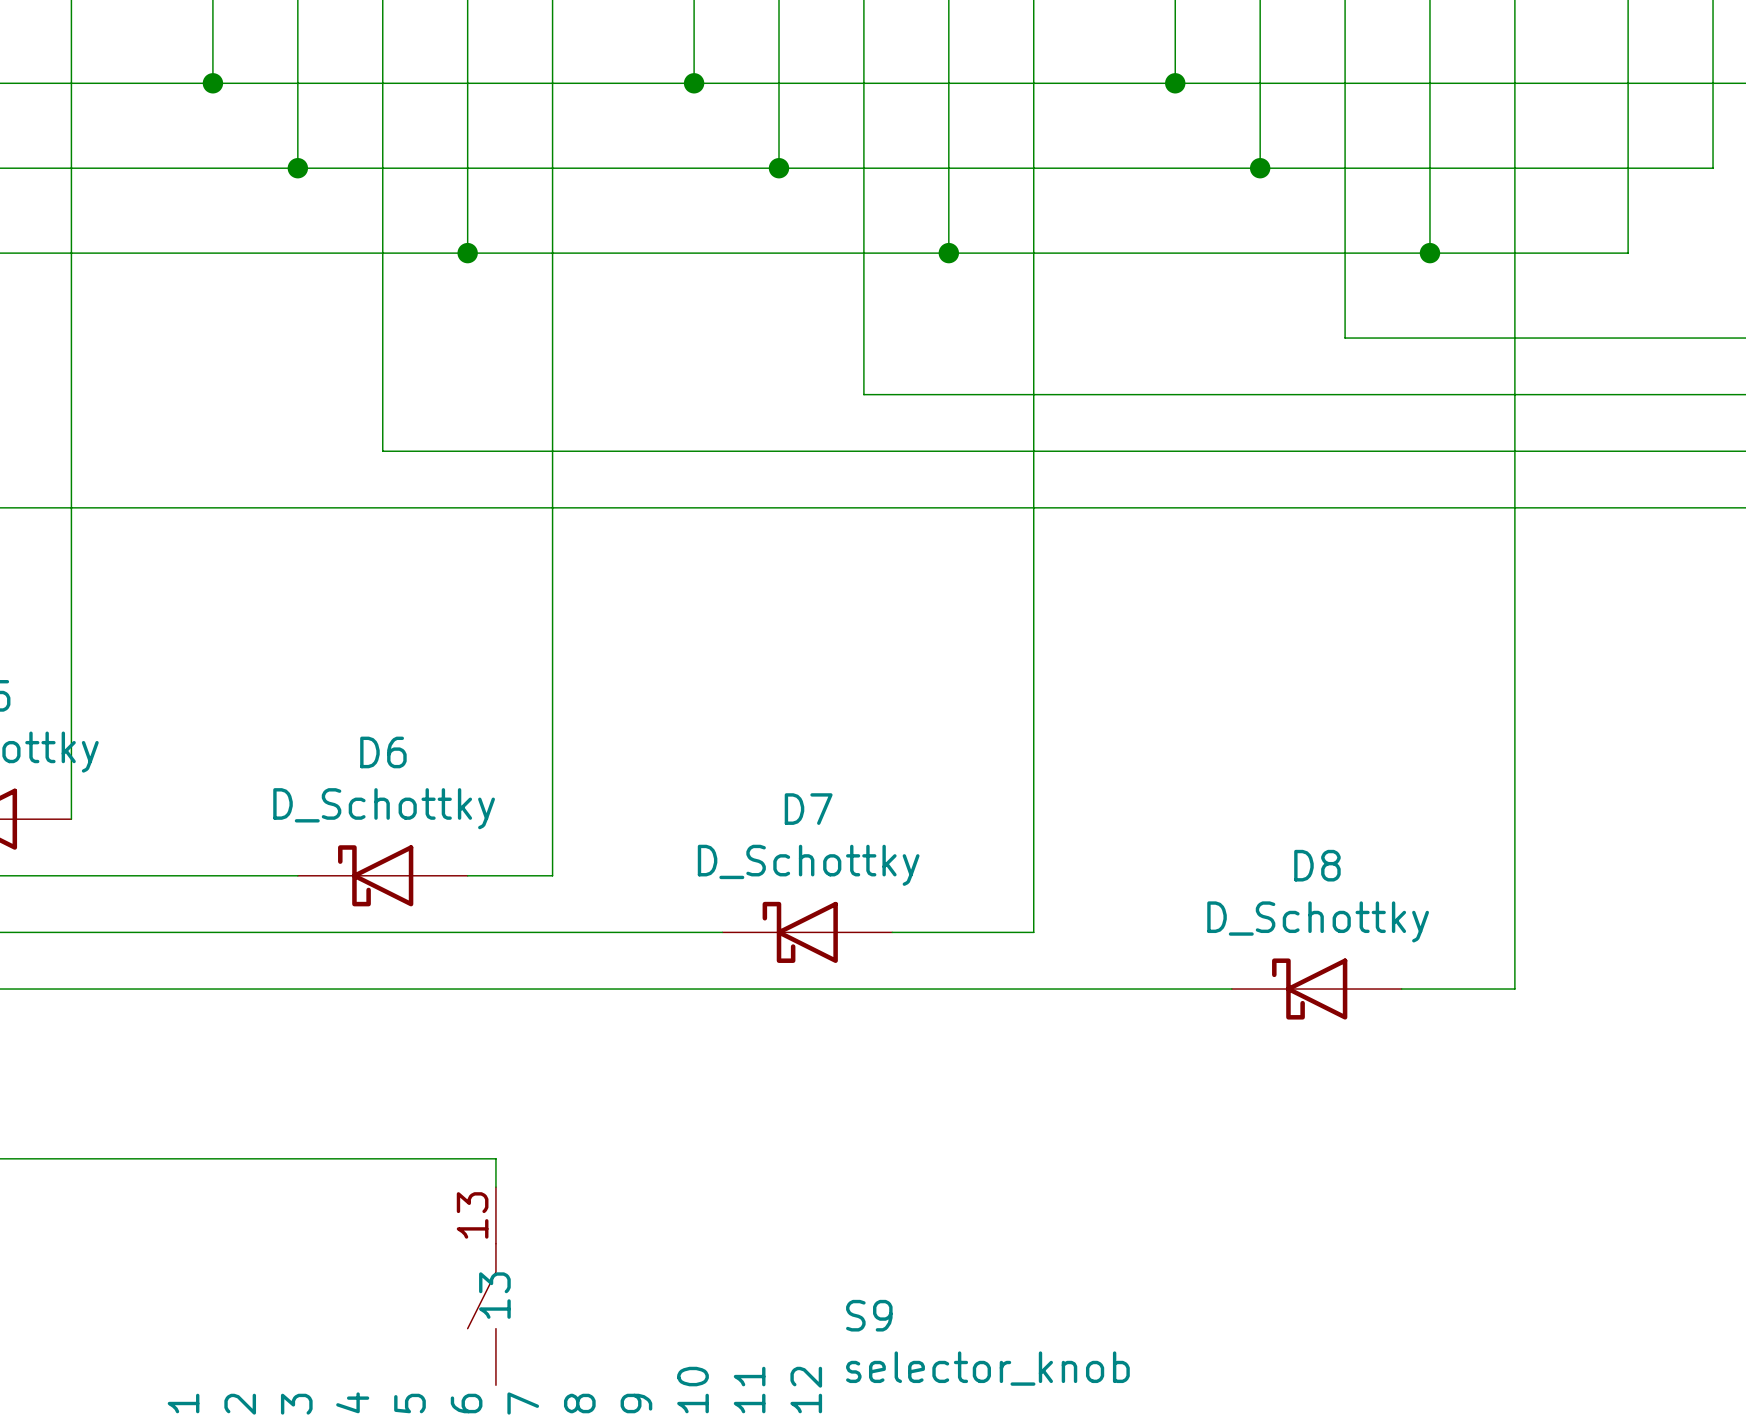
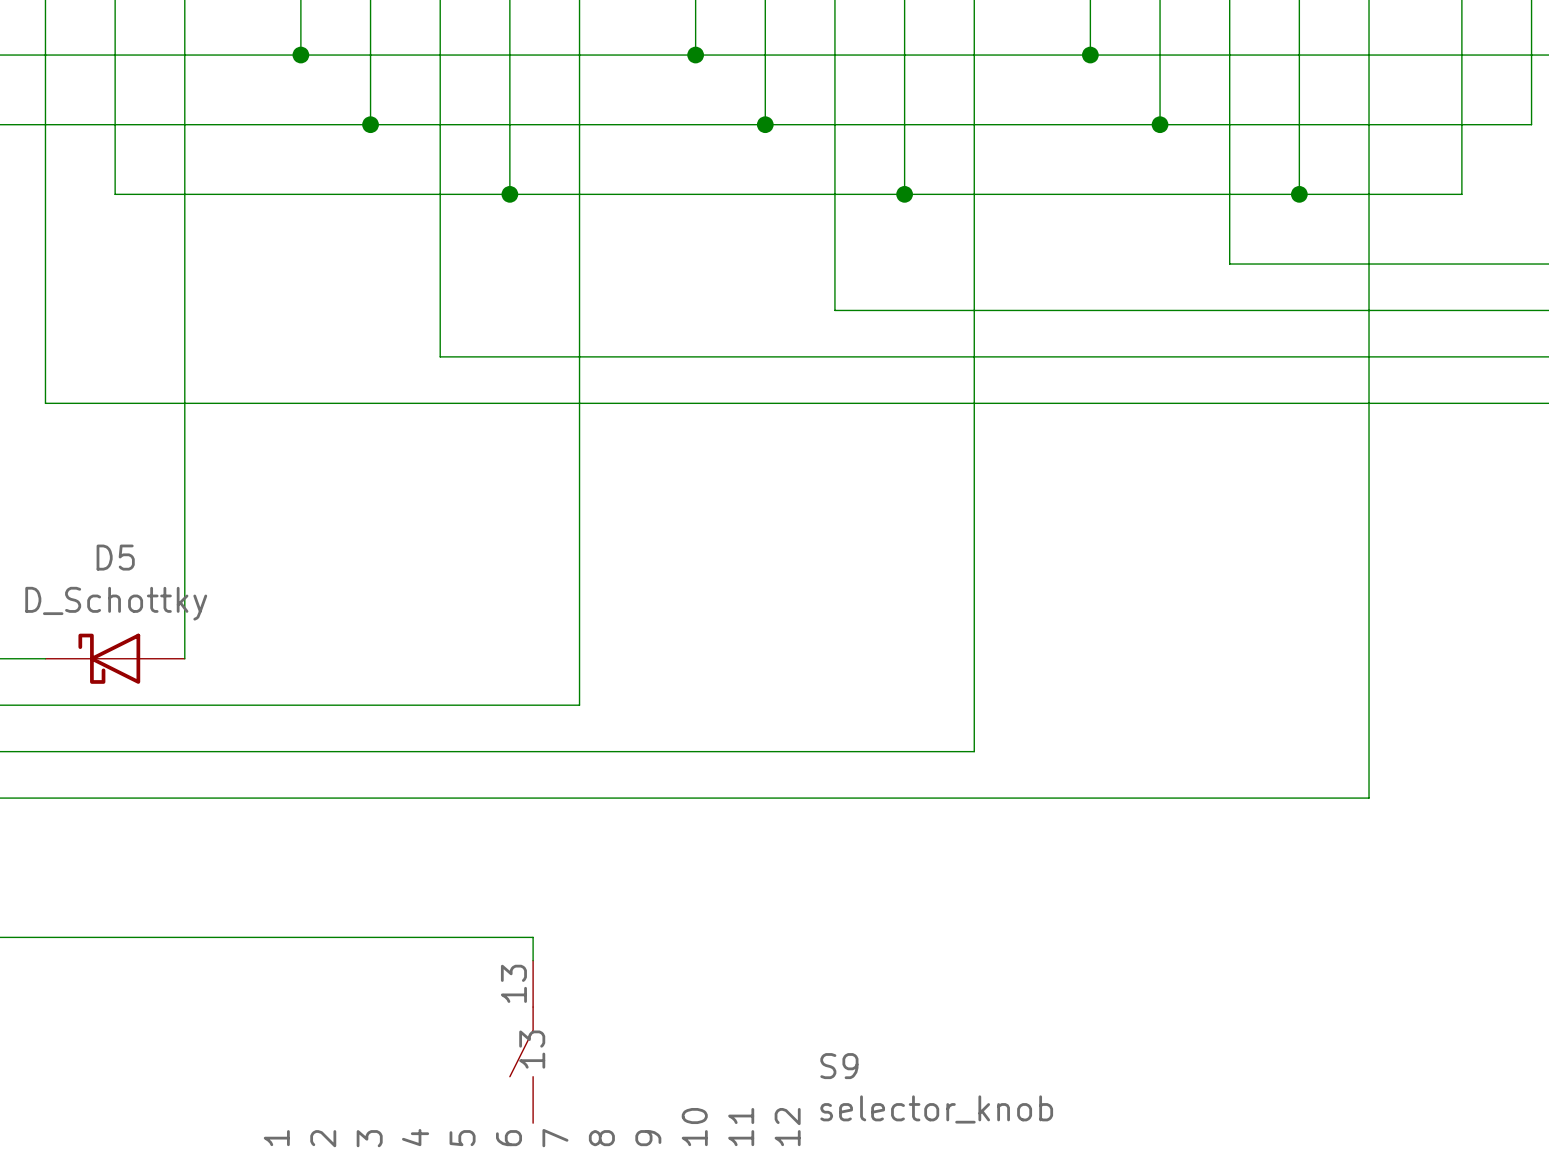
D6: D_Schottky (382, 875) -> none
D7: D_Schottky (807, 932) -> none
D8: D_Schottky (1316, 989) -> none

